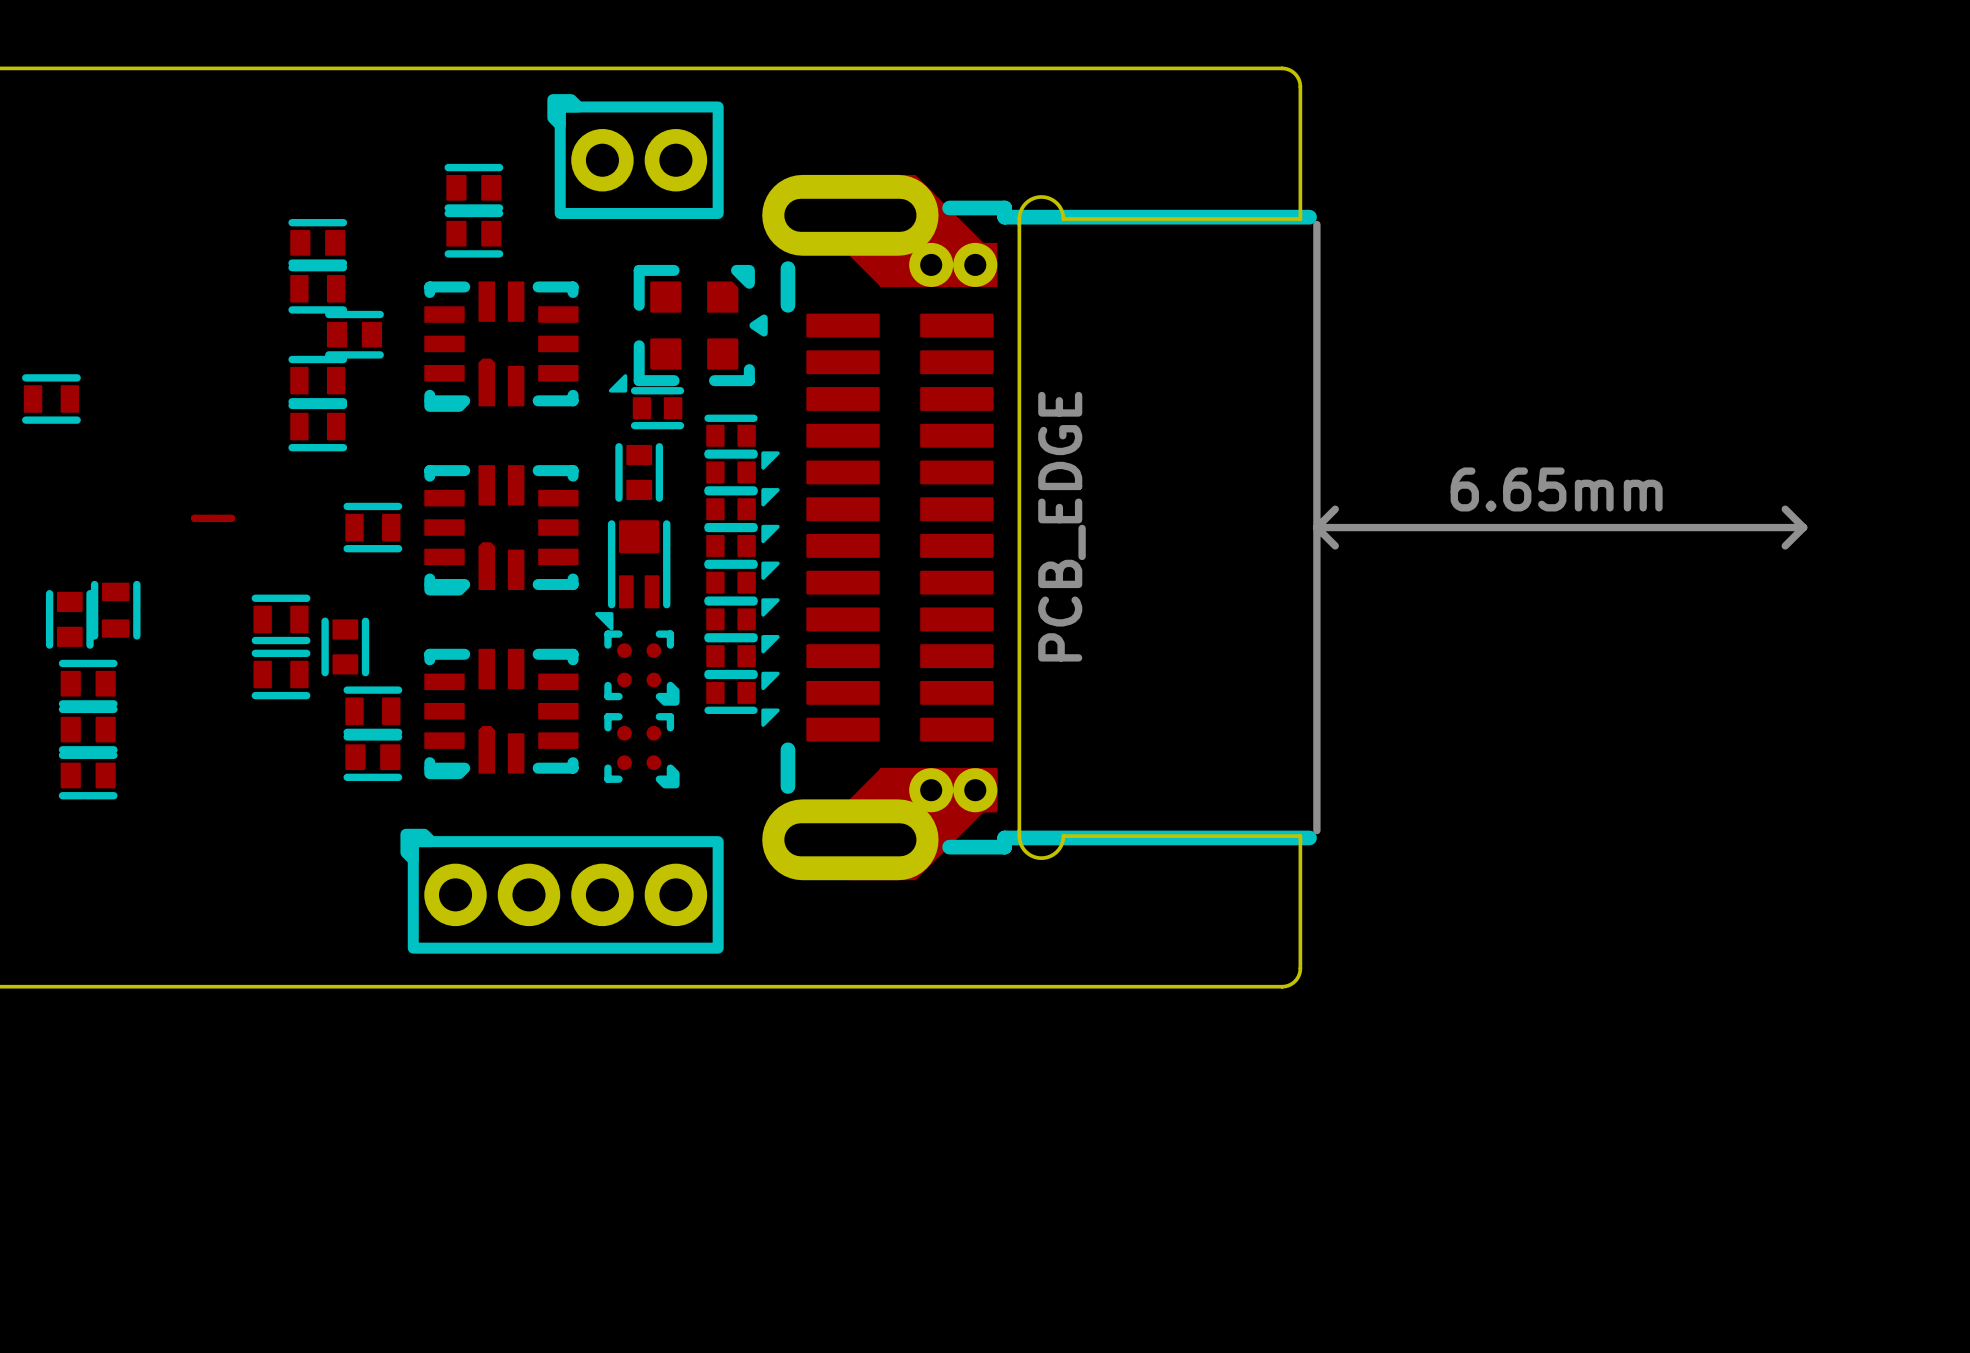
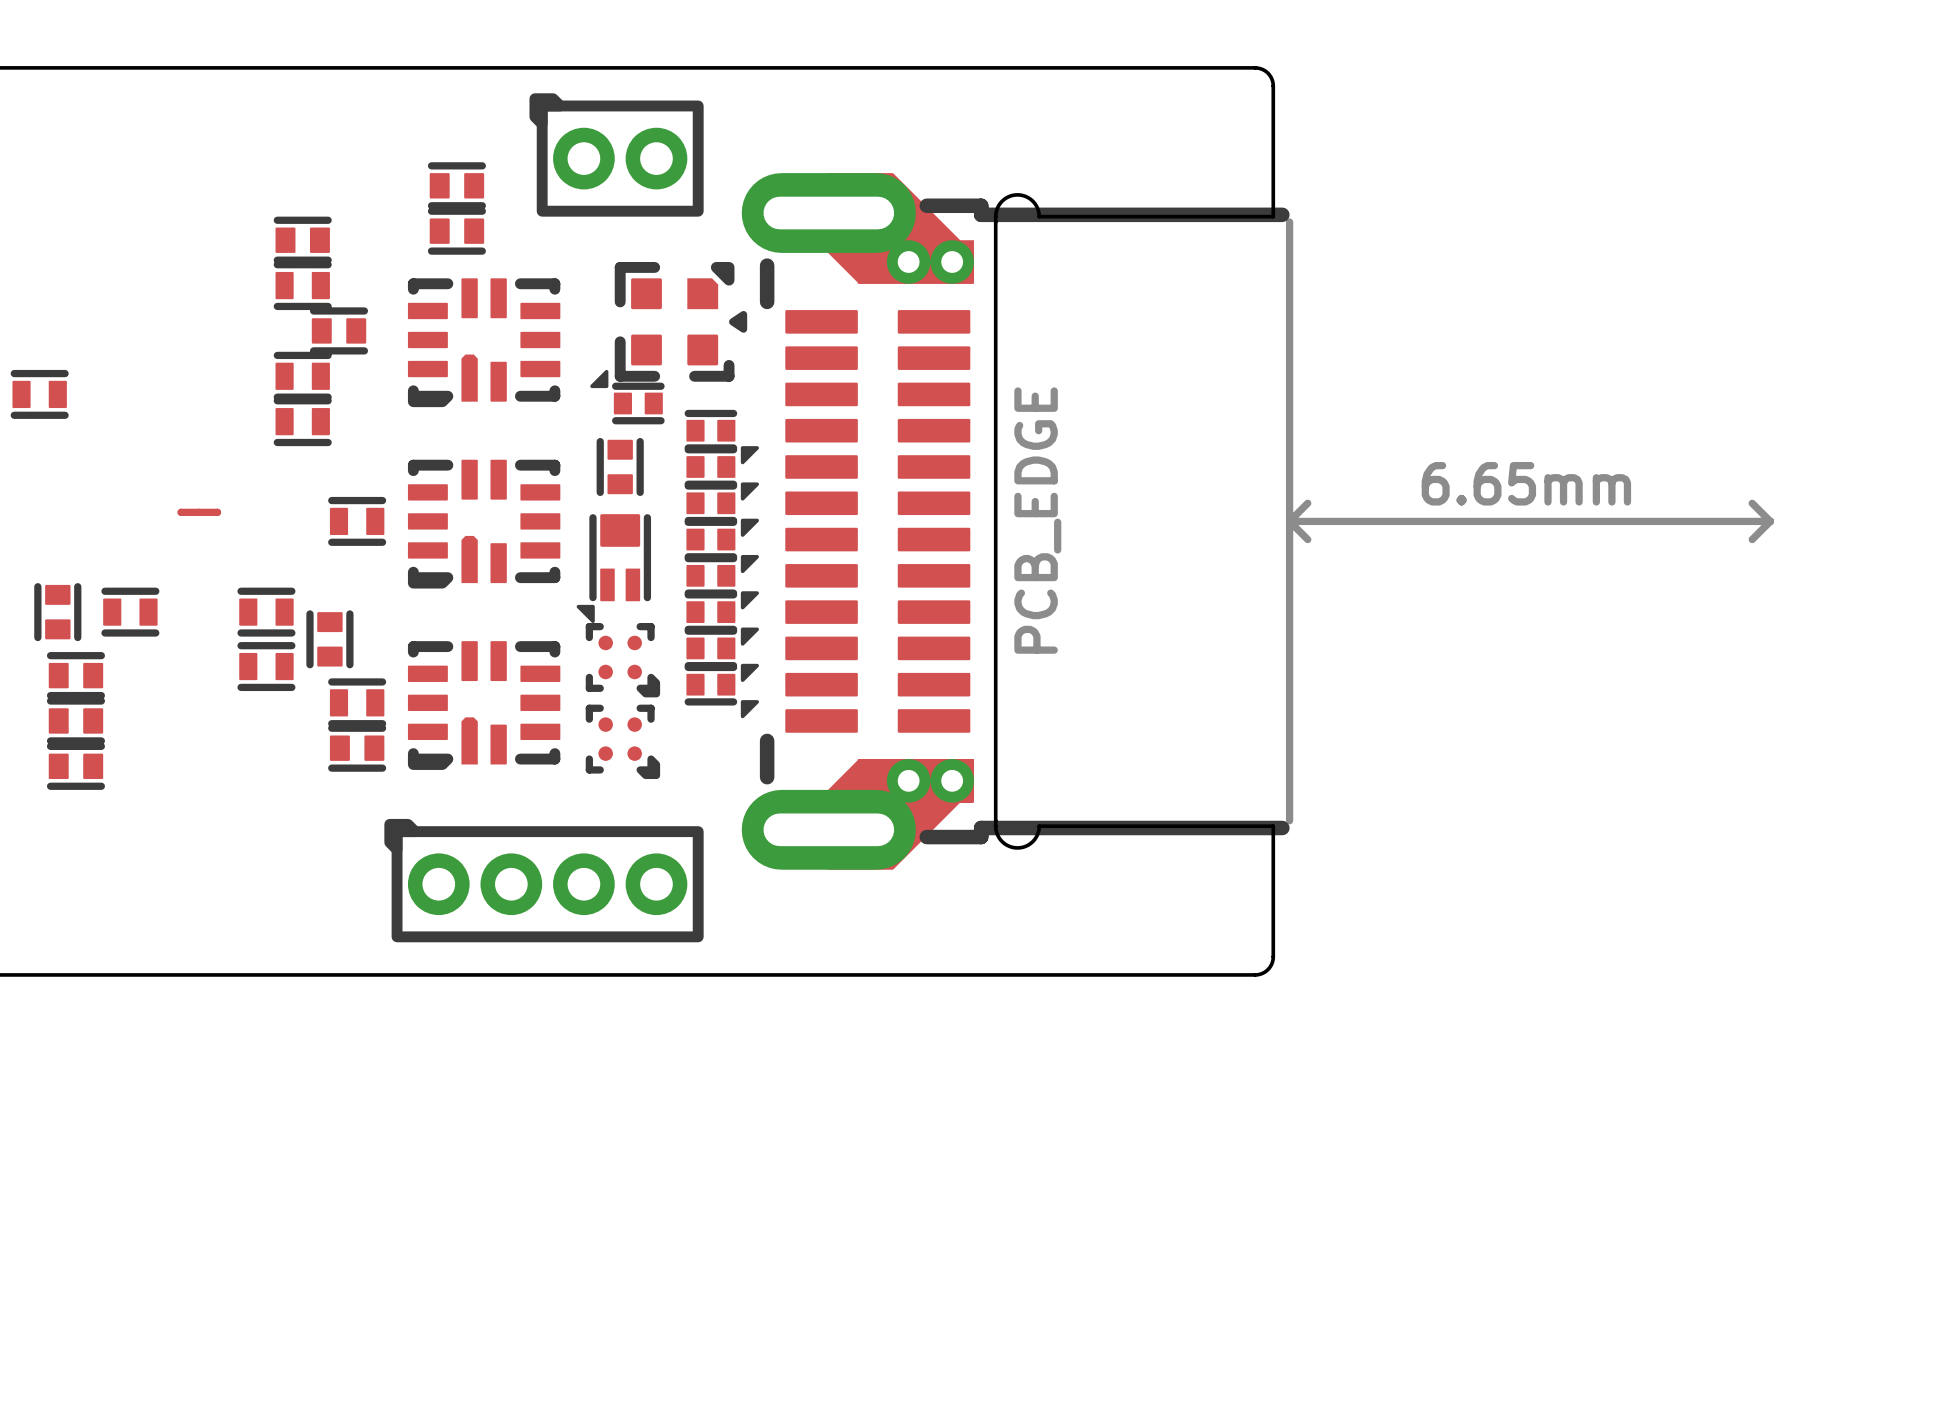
part rotation: 0° (115, 610) -> 90° clockwise (130, 612)

